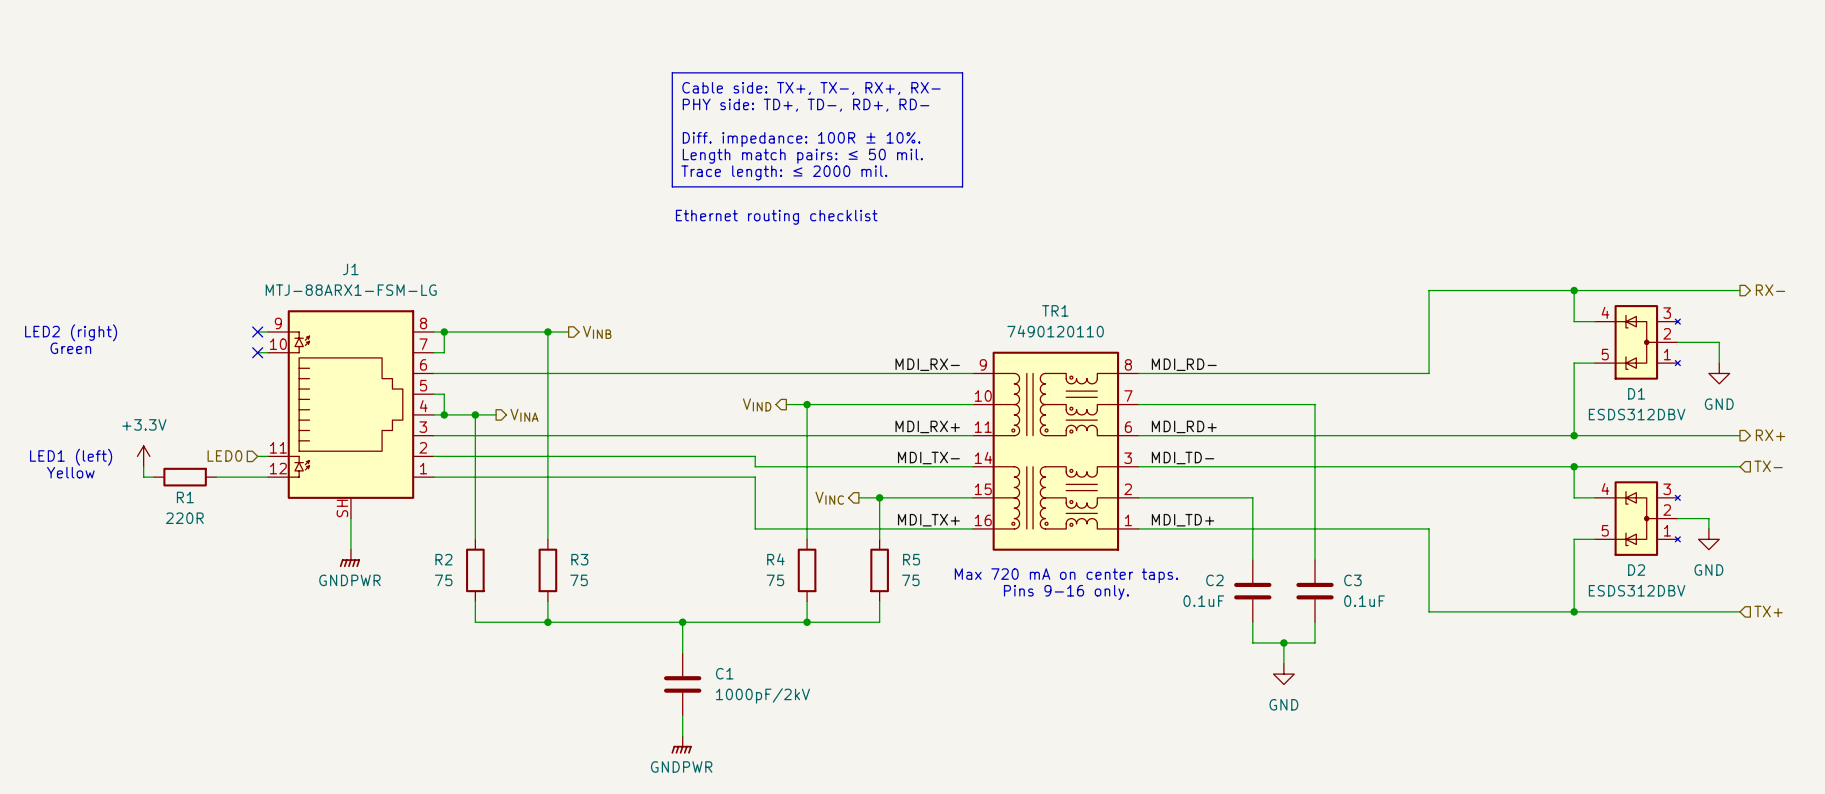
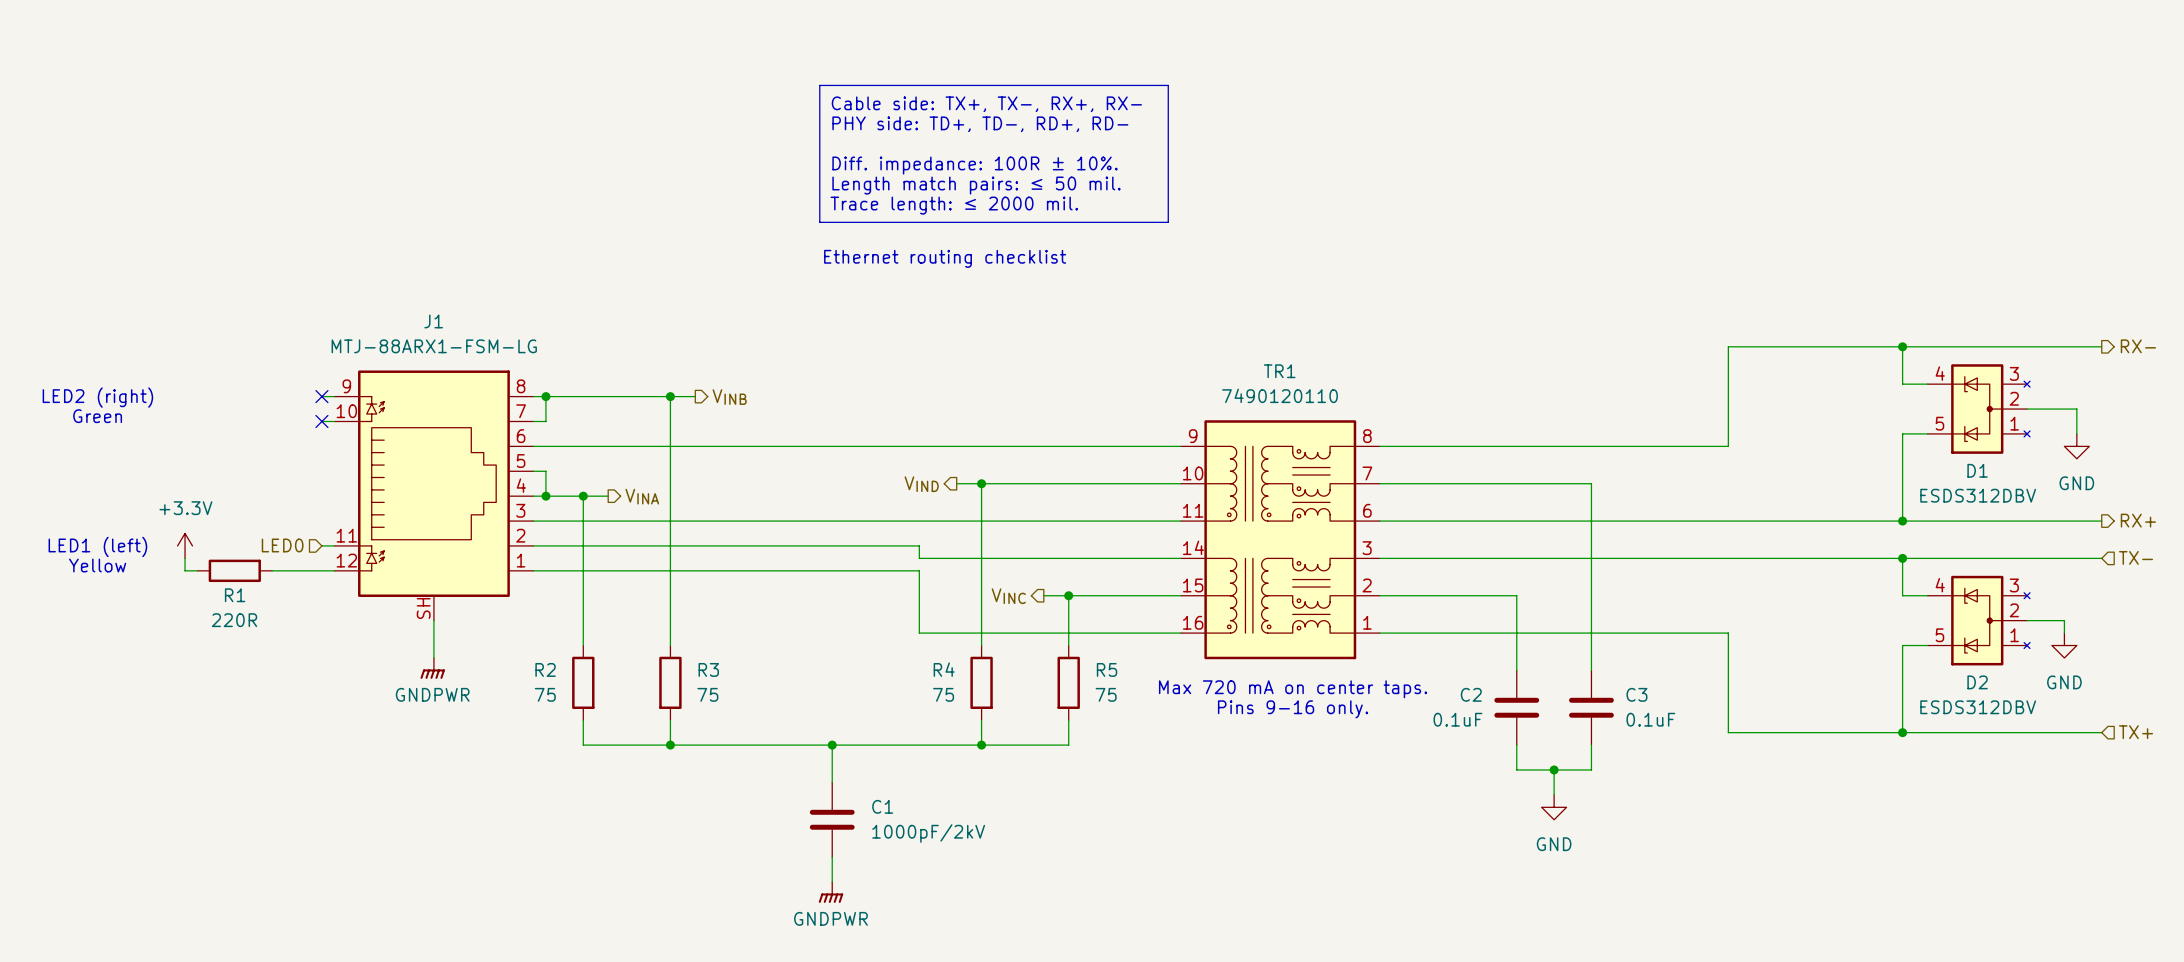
label: MDI_RX- (927, 364) -> none
label: MDI_RD- (1184, 364) -> none
label: MDI_RX+ (927, 426) -> none
label: MDI_RD+ (1184, 426) -> none
label: MDI_TX- (928, 458) -> none
label: MDI_TD- (1183, 458) -> none
label: MDI_TX+ (928, 520) -> none
label: MDI_TD+ (1183, 520) -> none

